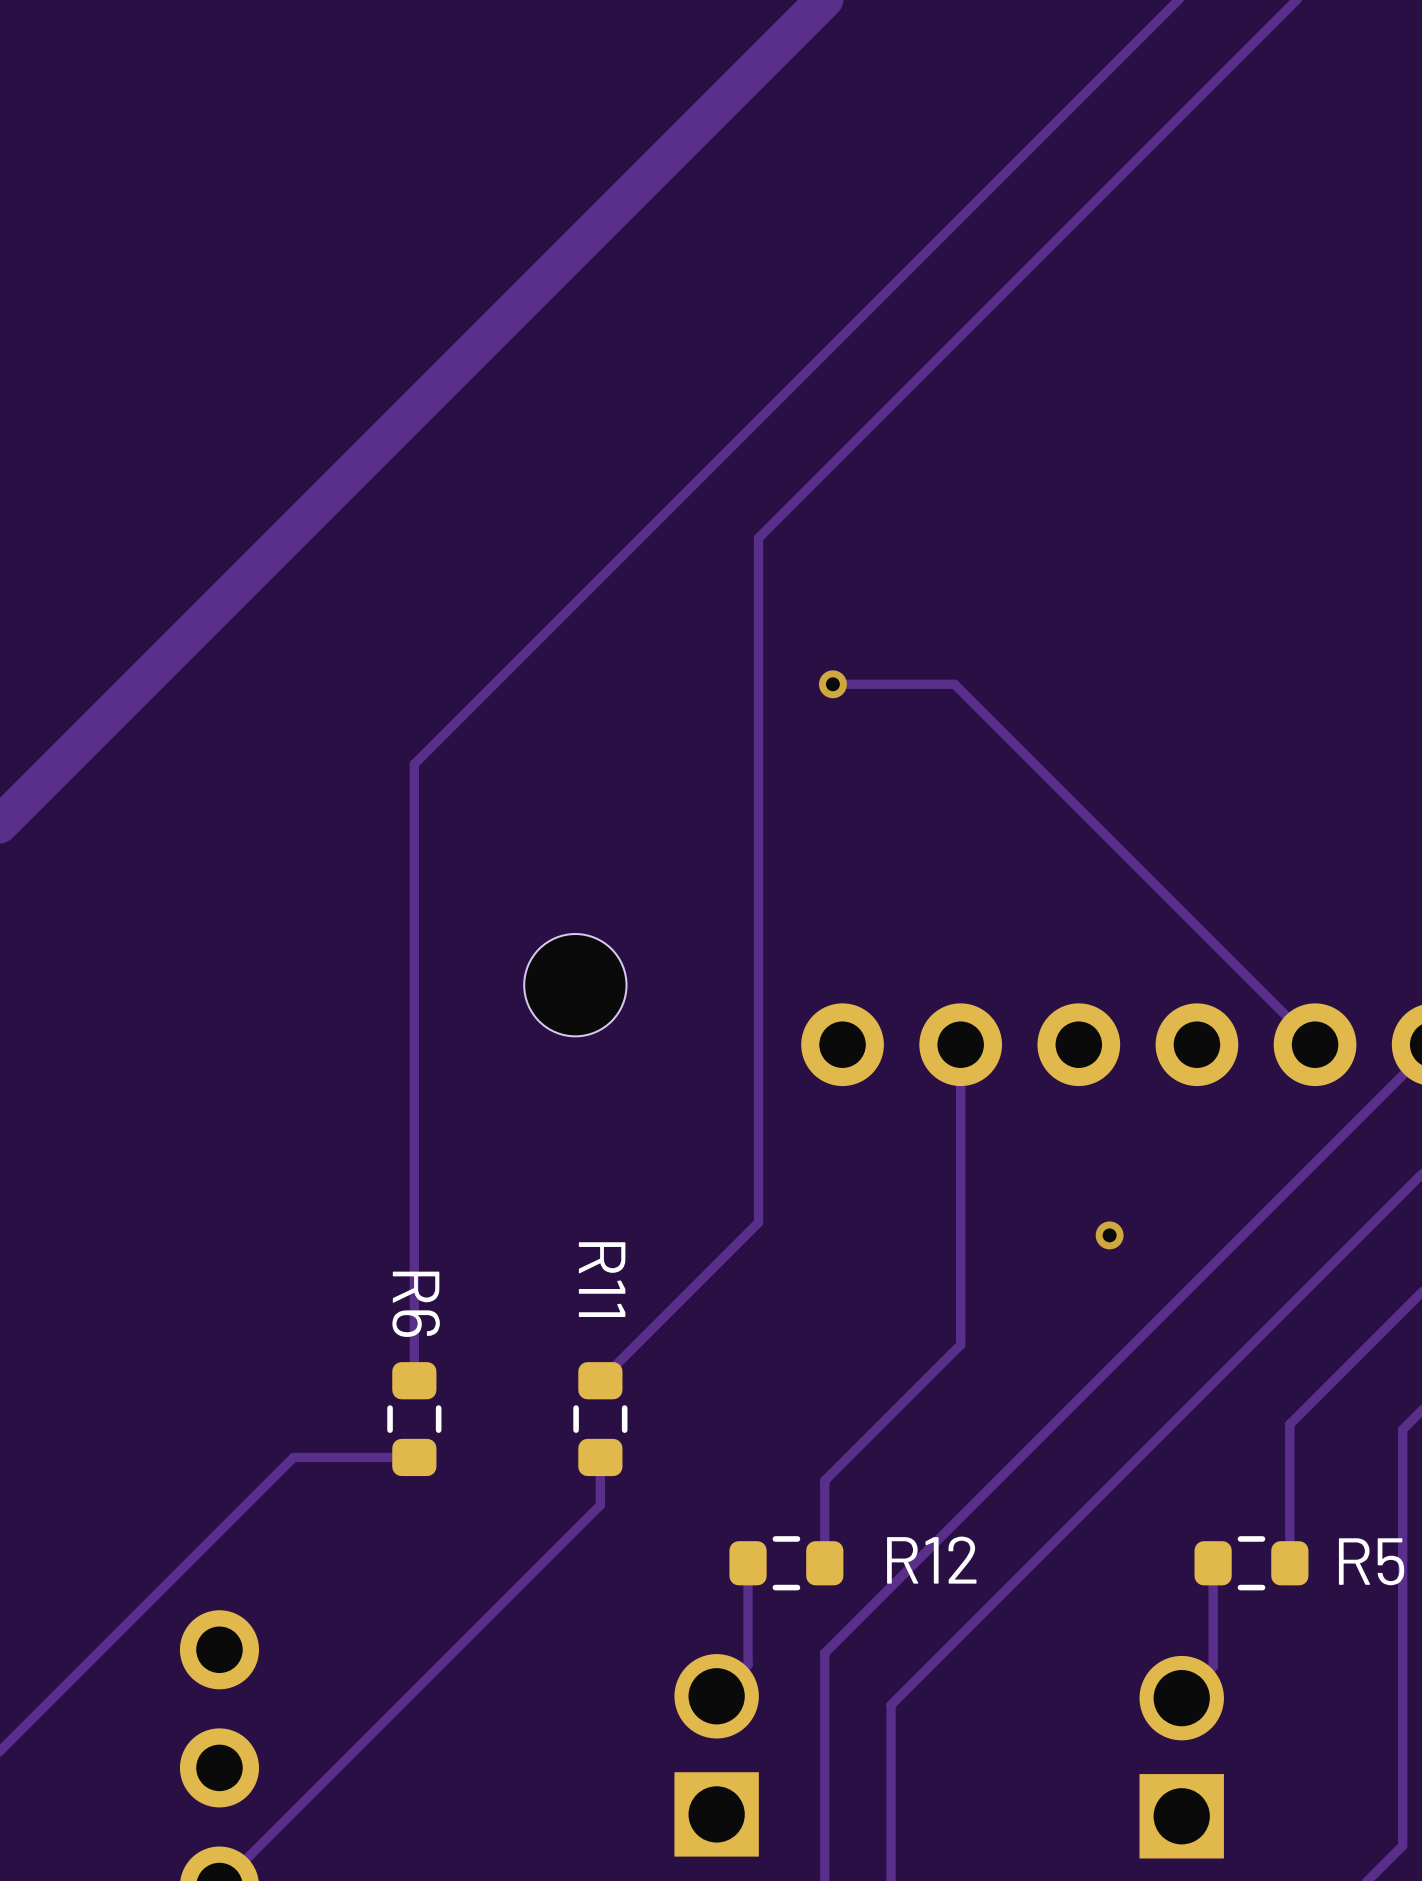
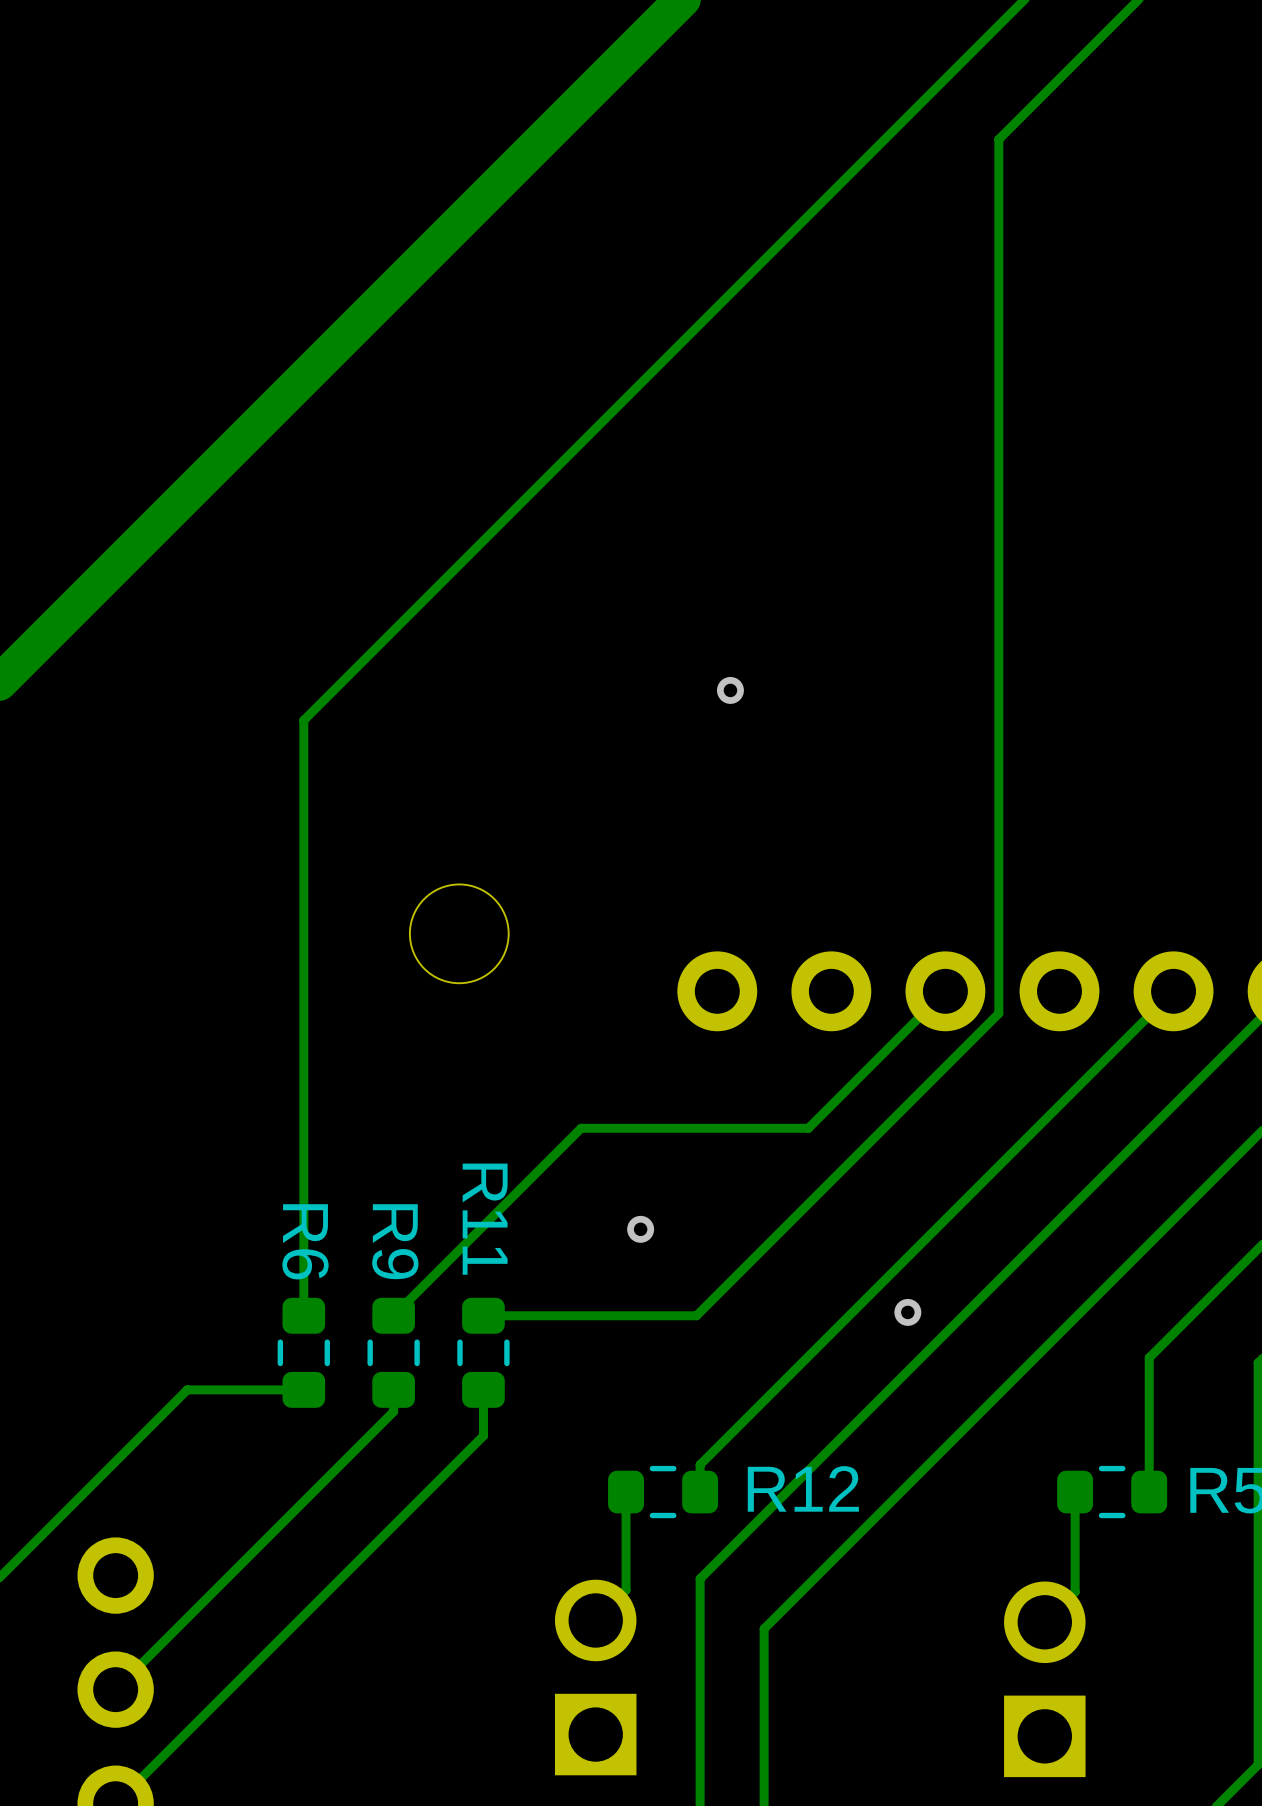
track: (1134, 162) (758, 538) (758, 1222) (600, 1380) -> (998, 139) (998, 1013) (696, 1315) (483, 1315)
track: (832, 684) (954, 684) (1315, 1044) -> none
via position: (832, 684) -> (730, 690)
track: (960, 1044) (960, 1344) (824, 1480) (824, 1534) -> (1173, 991) (700, 1464)
track: none -> (945, 991) (808, 1128) (581, 1128) (393, 1315)
via position: (1109, 1235) -> (907, 1312)
via: none -> (640, 1229)
R9: none -> (393, 1352)
track: none -> (393, 1389) (393, 1411) (115, 1689)

